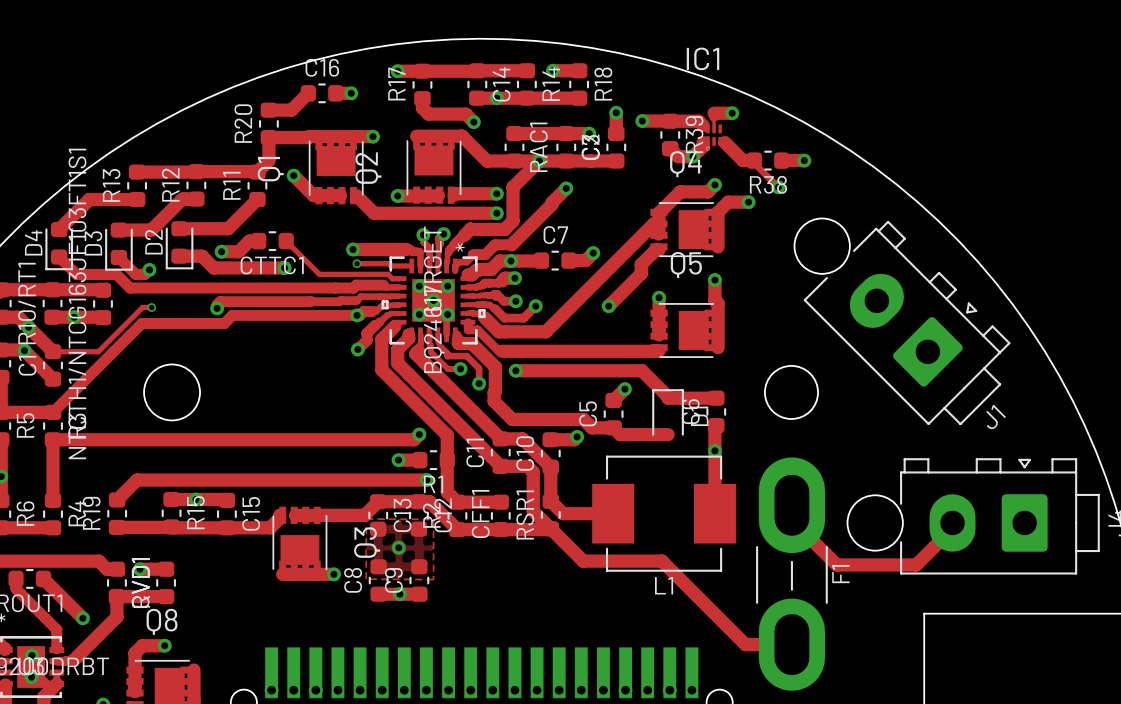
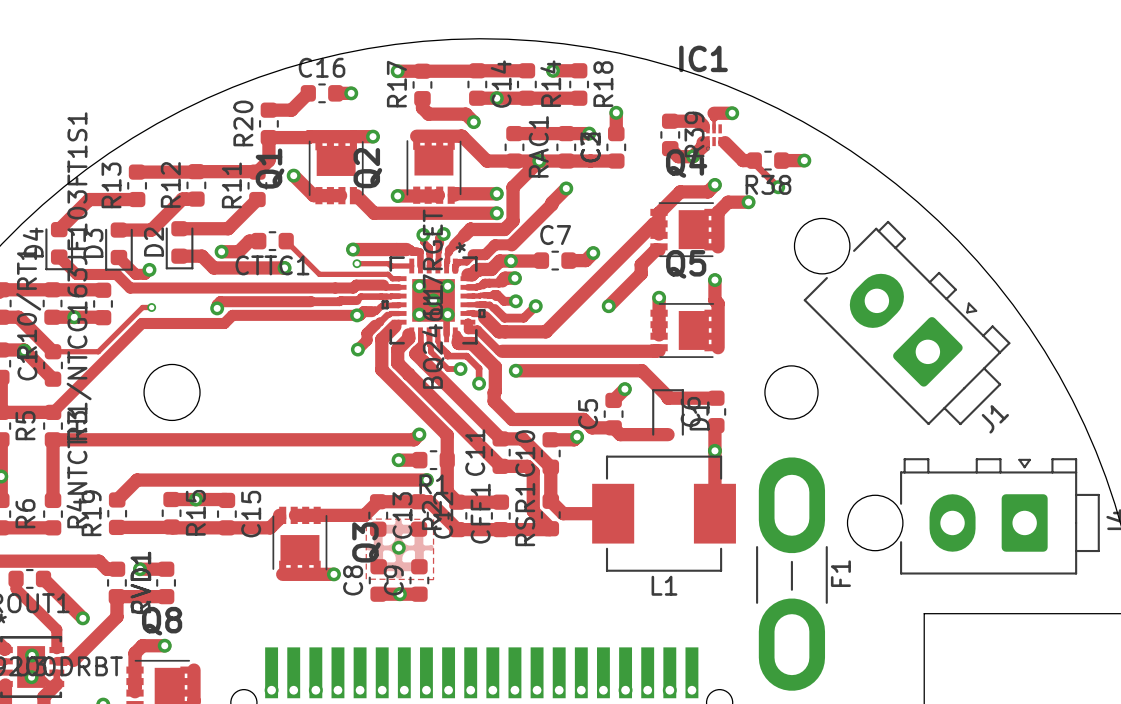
track: (642, 121) (670, 121) -> none
via: (642, 121) -> none
via: (28, 327) -> none
track: (791, 505) (791, 520) (836, 564) (916, 564) (952, 528) (952, 522) -> none
track: (550, 528) (583, 561) (662, 561) (745, 644) (791, 644) -> none

